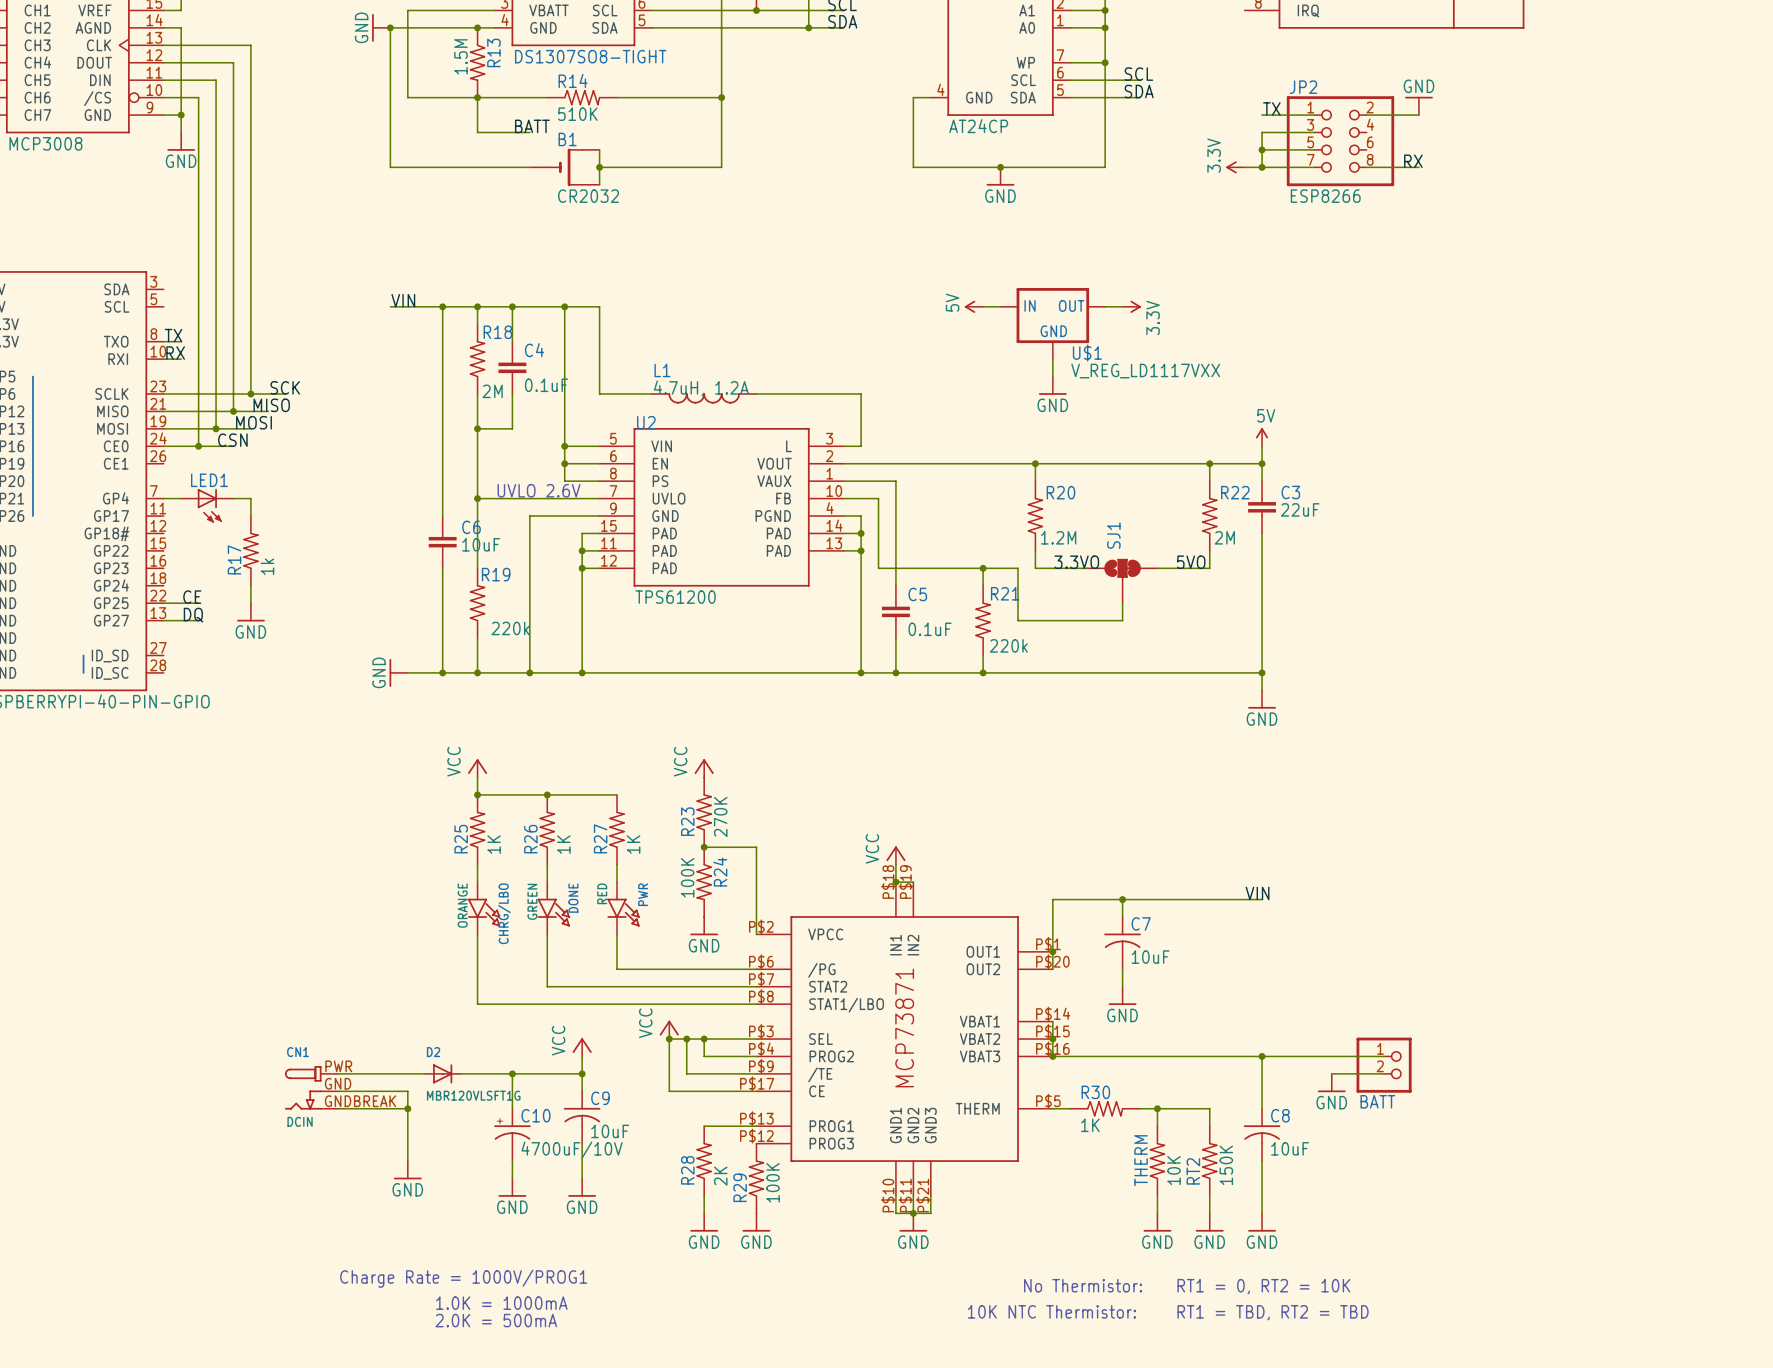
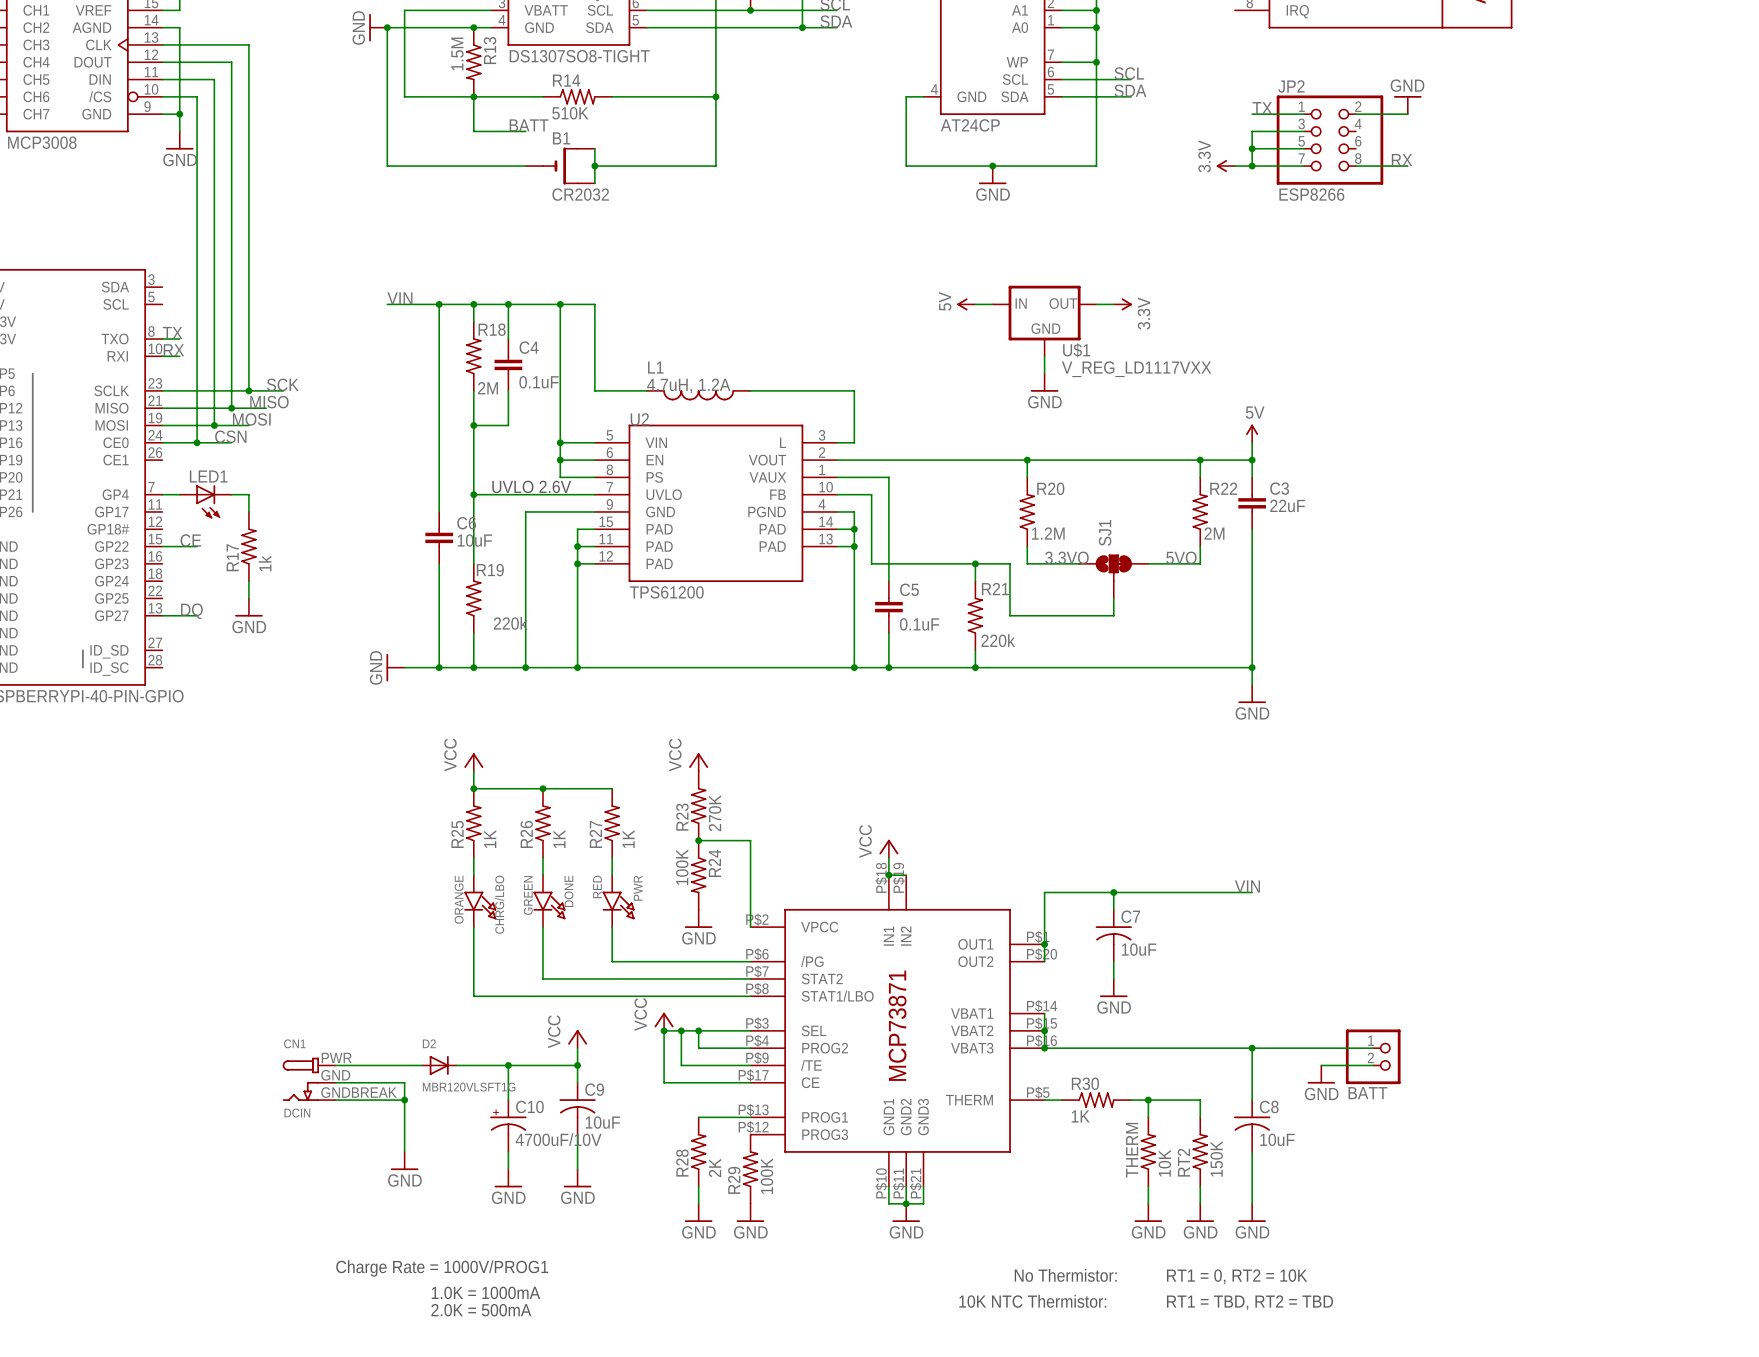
label position: CE (192, 597) -> CE (190, 540)
wire: (163, 603) (198, 603) -> (162, 546) (197, 546)

